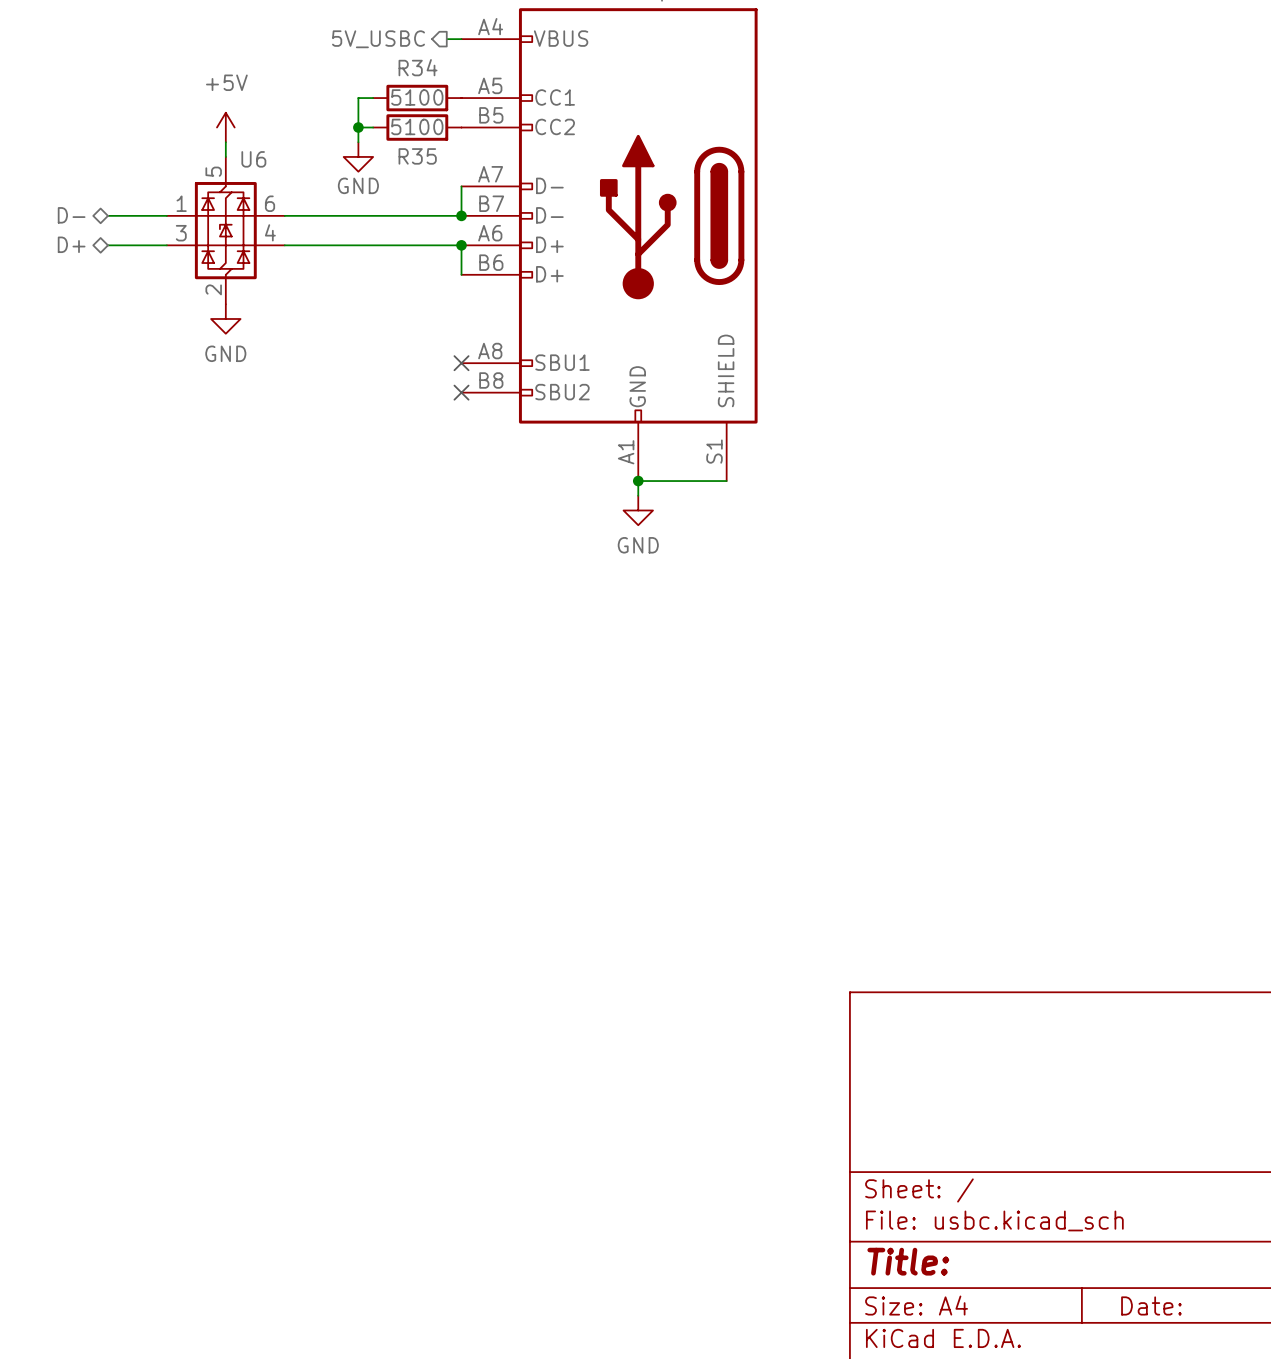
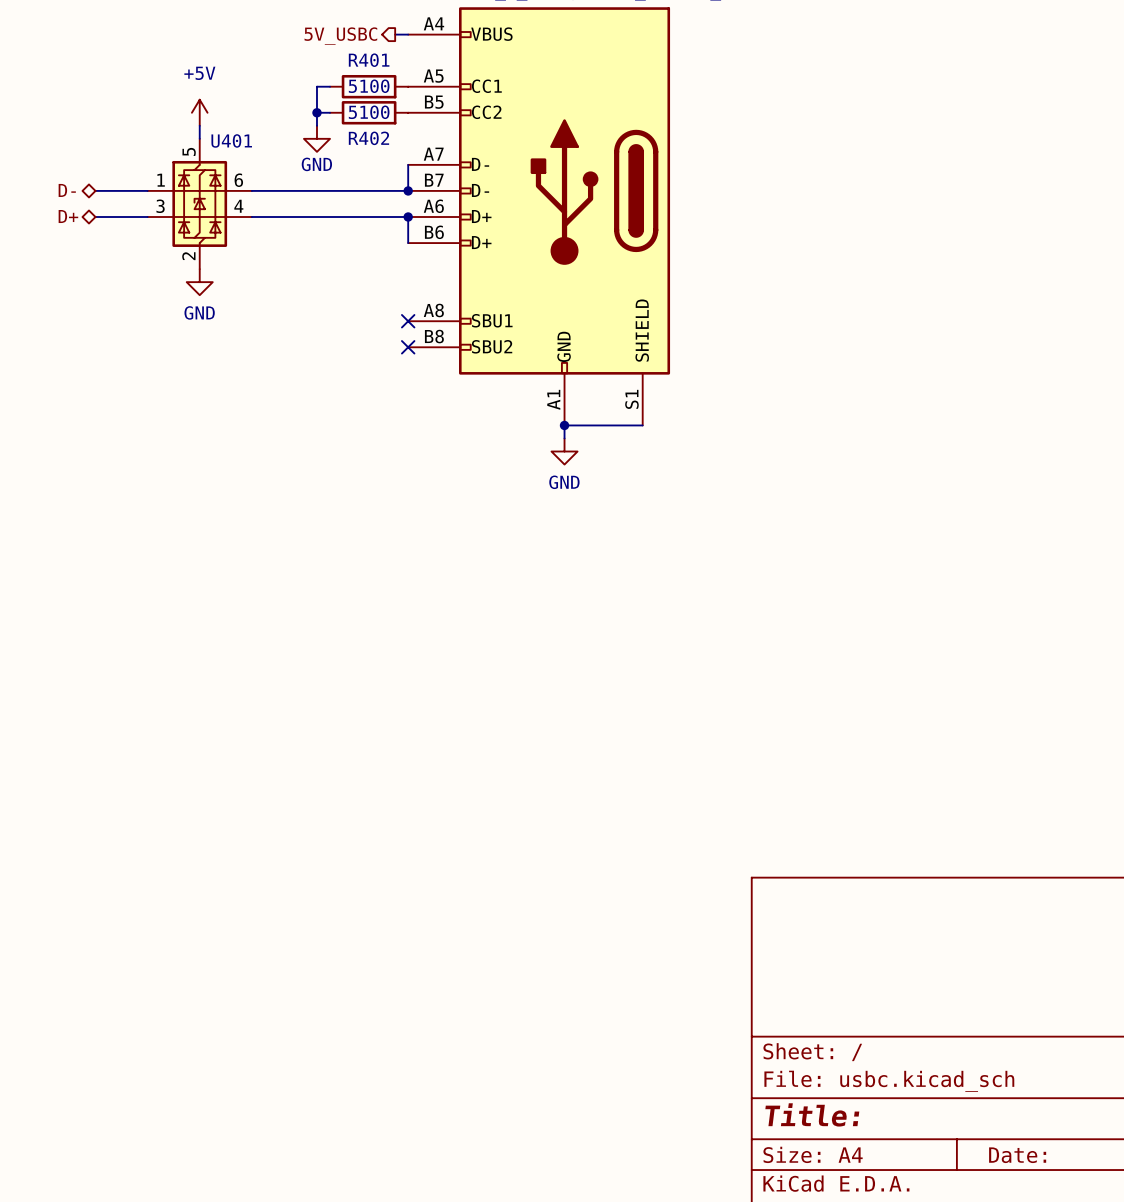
R34 name: R34 (418, 67) -> R401 (369, 60)
R35 name: R35 (417, 156) -> R402 (368, 138)
U6 name: U6 (253, 159) -> U401 (231, 140)

